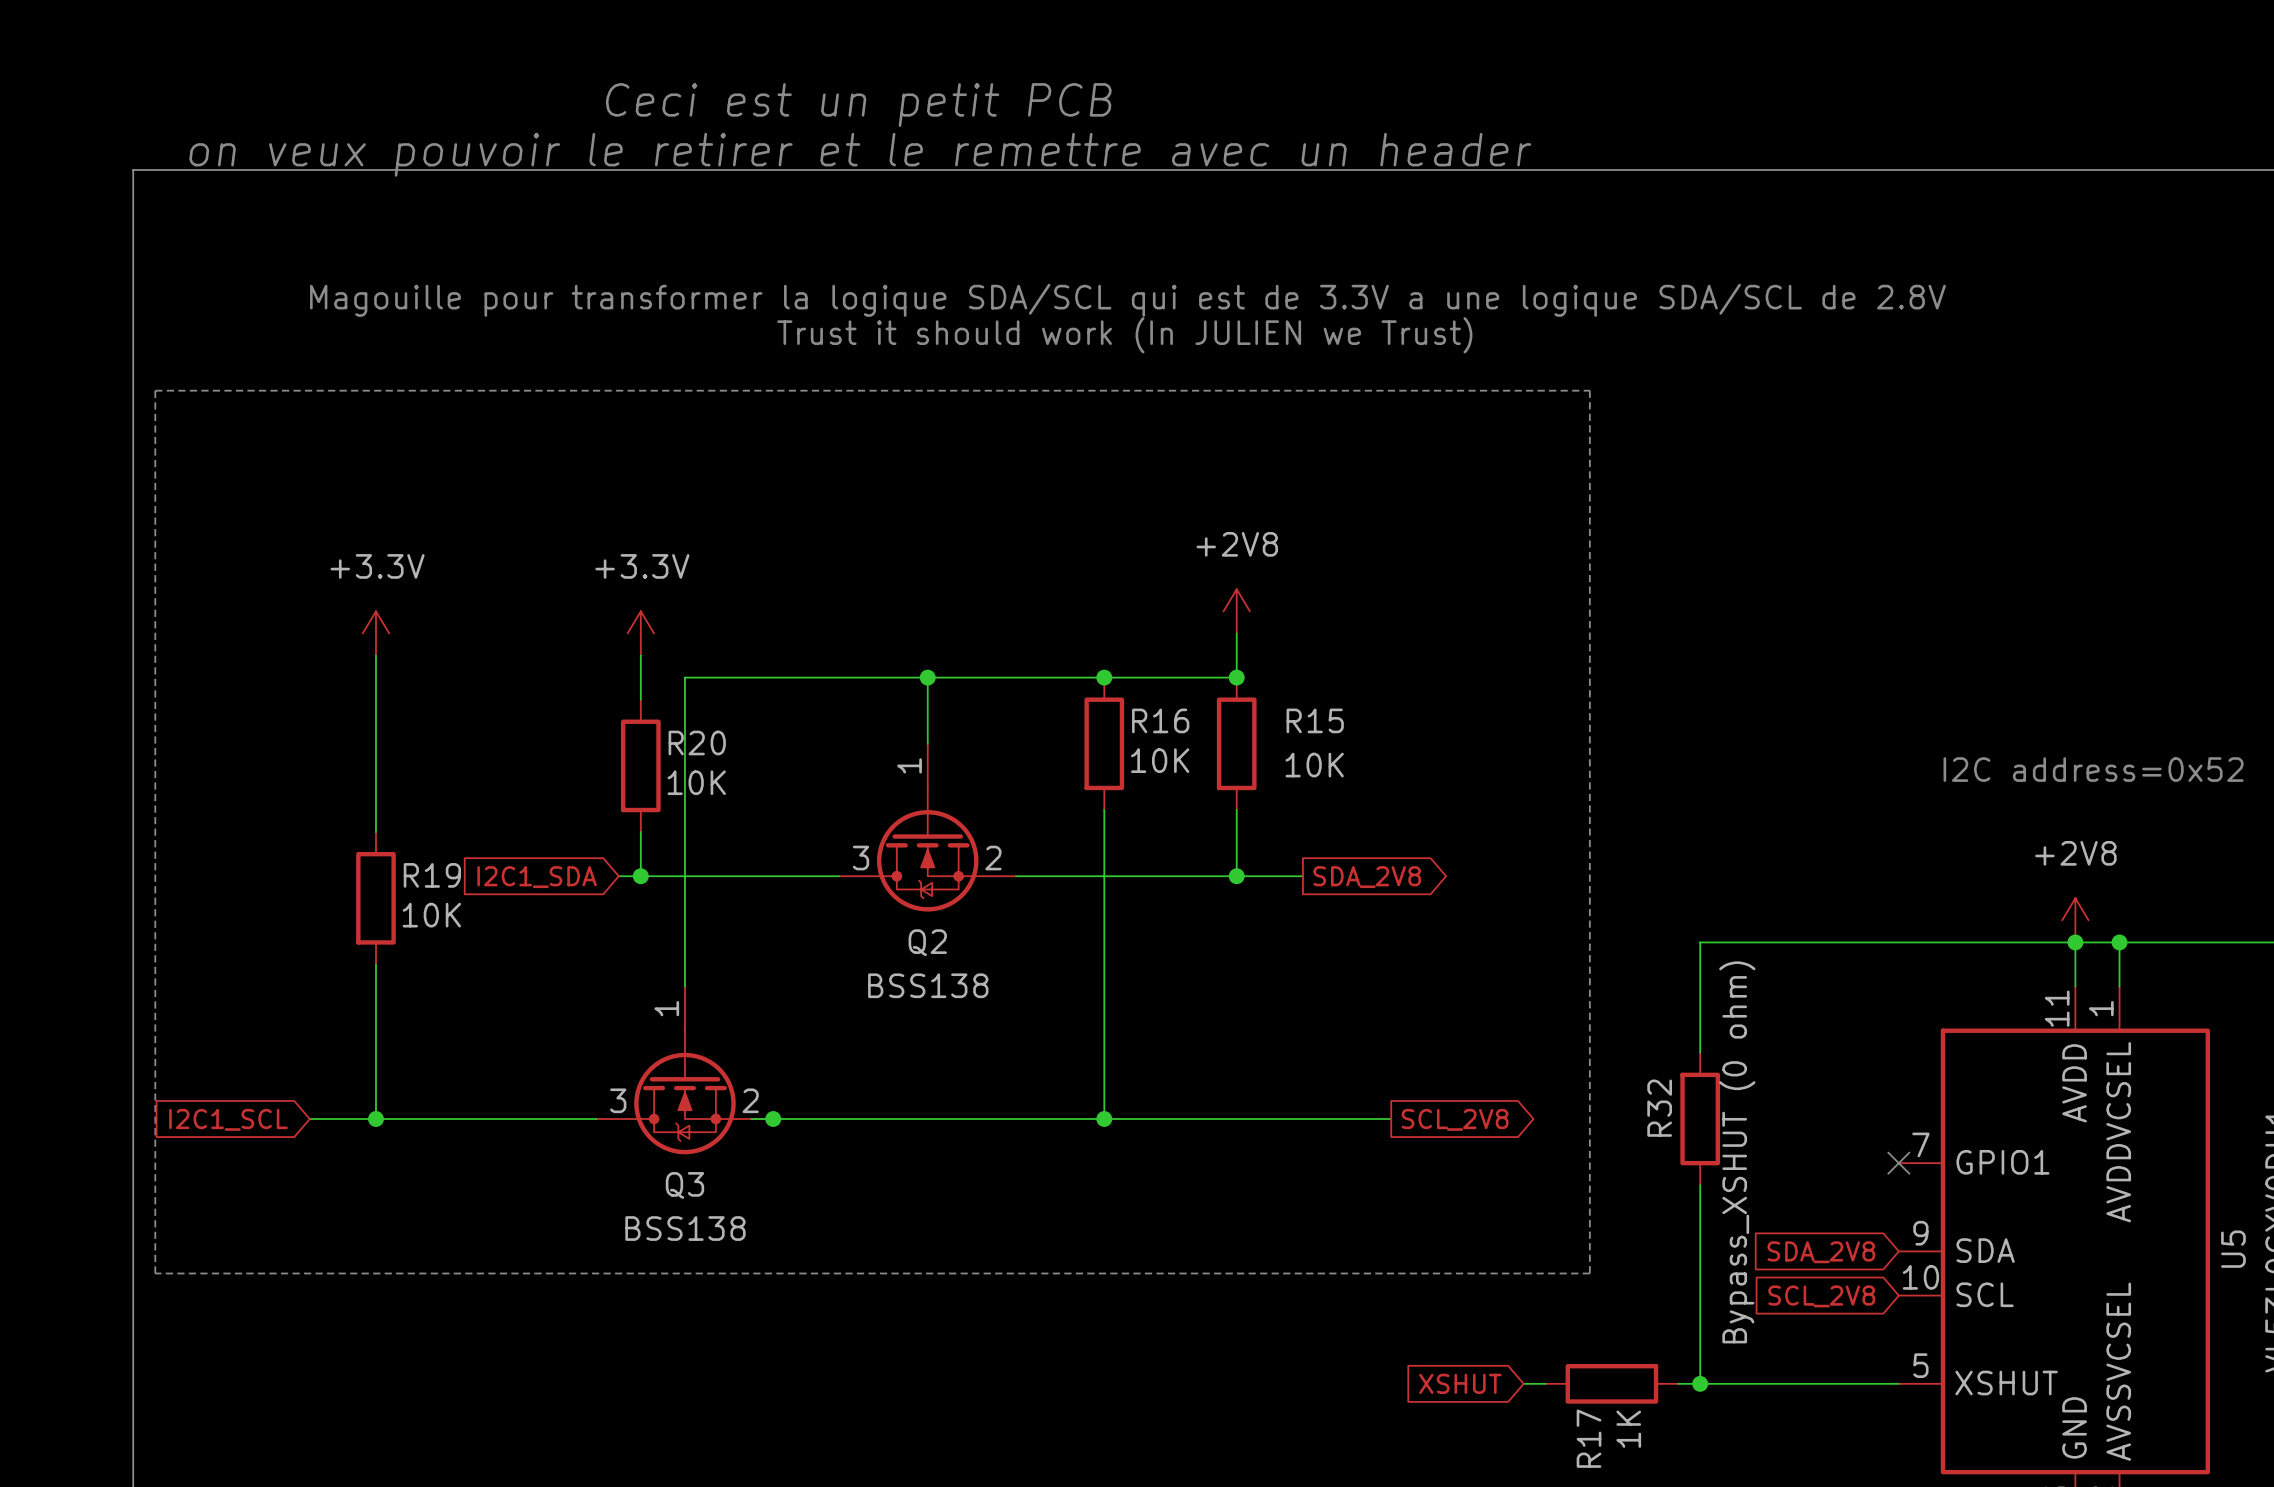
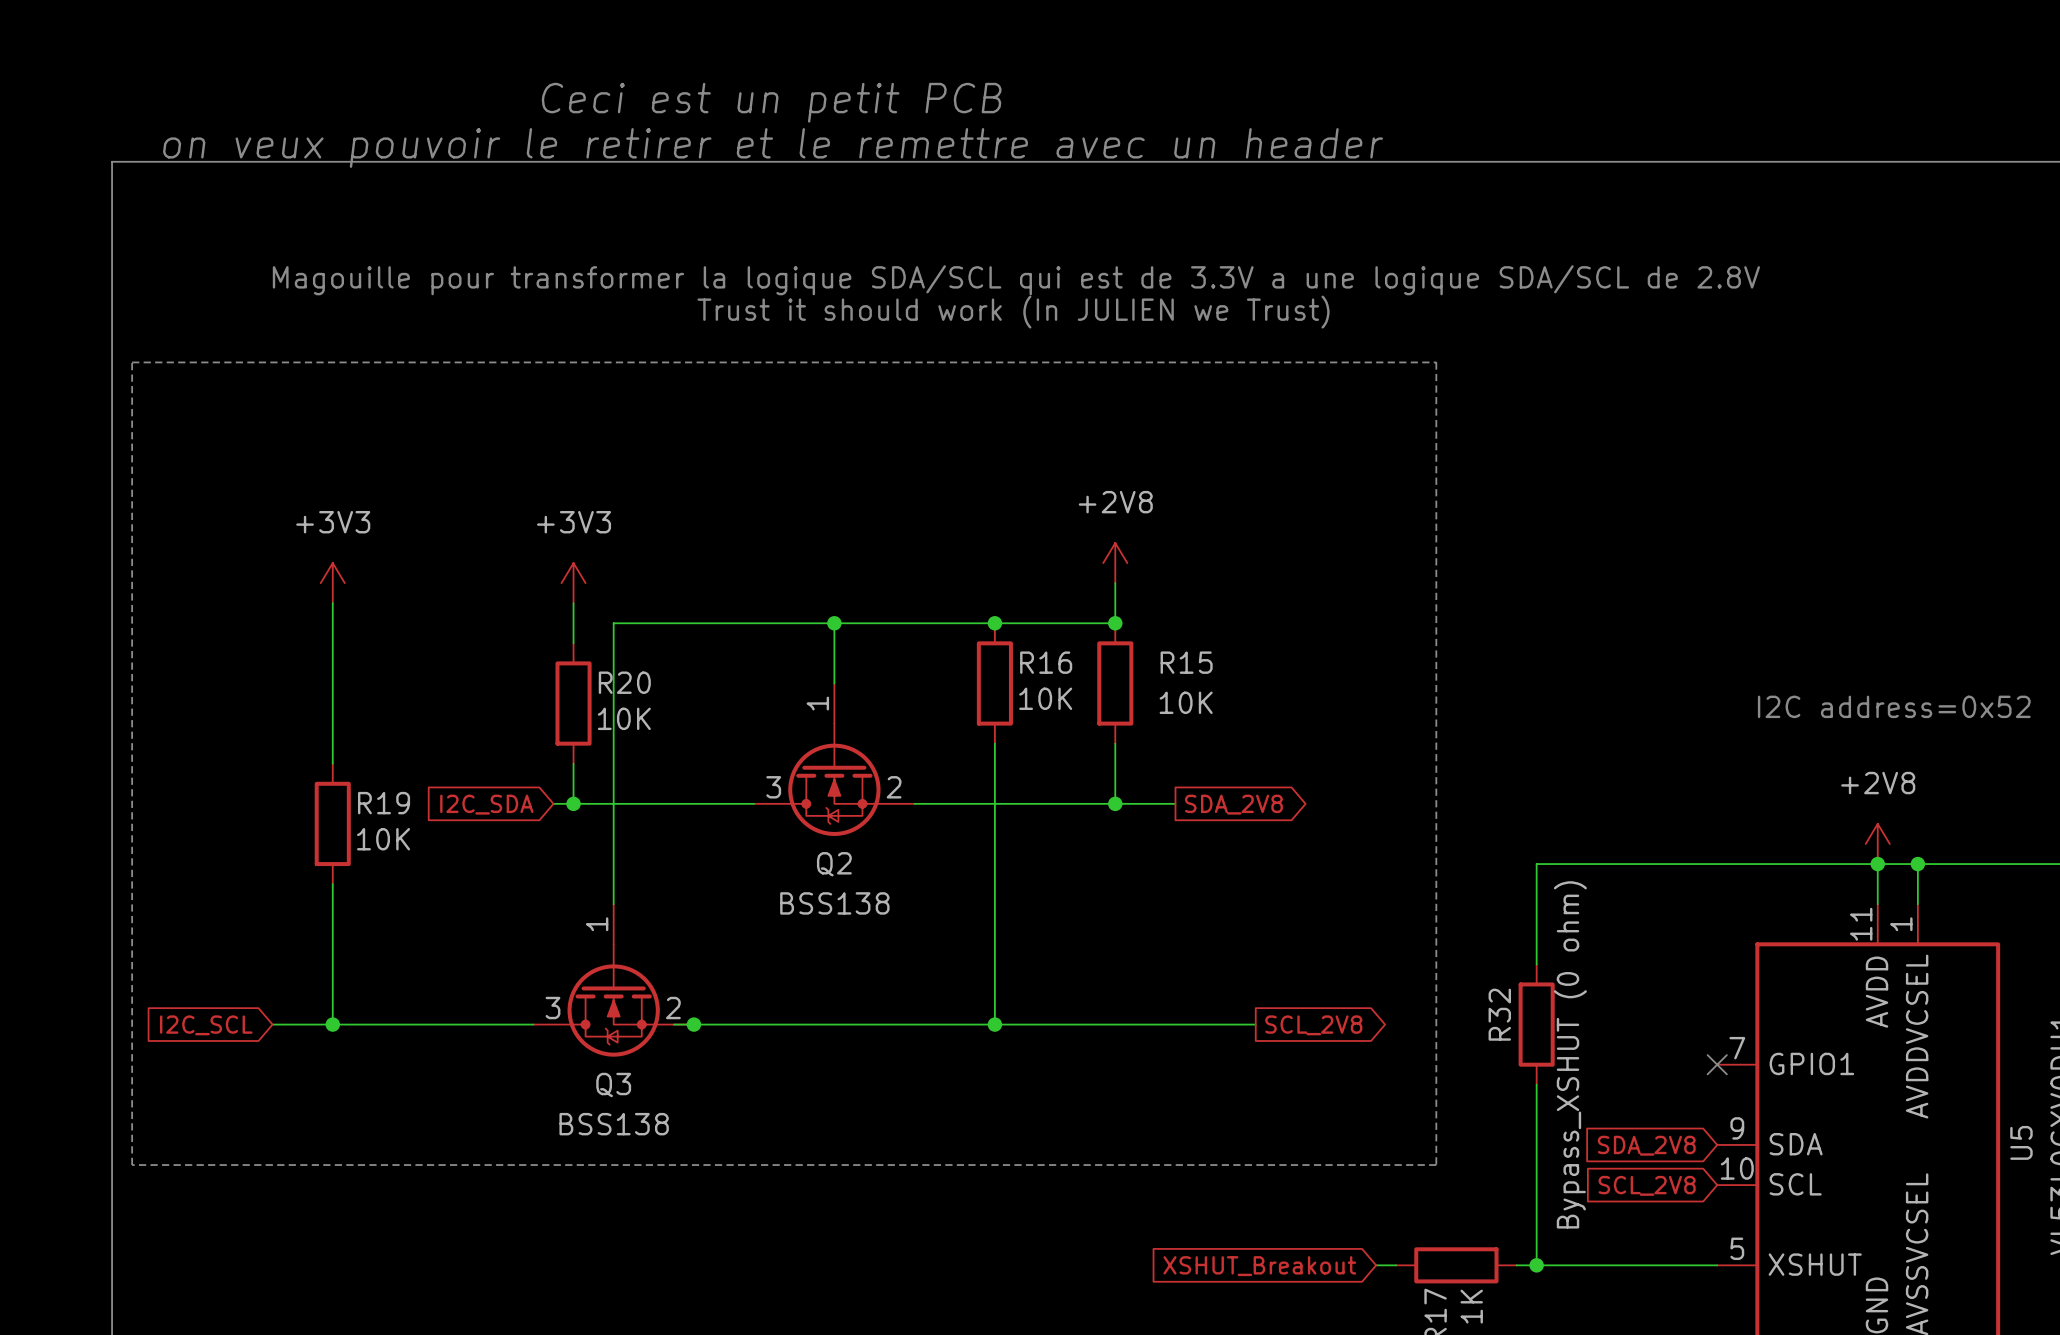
power symbol: +3.3V (375, 633) -> +3V3 (332, 583)
power symbol: +3.3V (640, 633) -> +3V3 (573, 583)
global label: I2C1_SDA (537, 877) -> I2C_SDA (486, 804)
global label: I2C1_SCL (228, 1119) -> I2C_SCL (206, 1025)
global label: XSHUT (1460, 1383) -> XSHUT_Breakout (1259, 1266)

